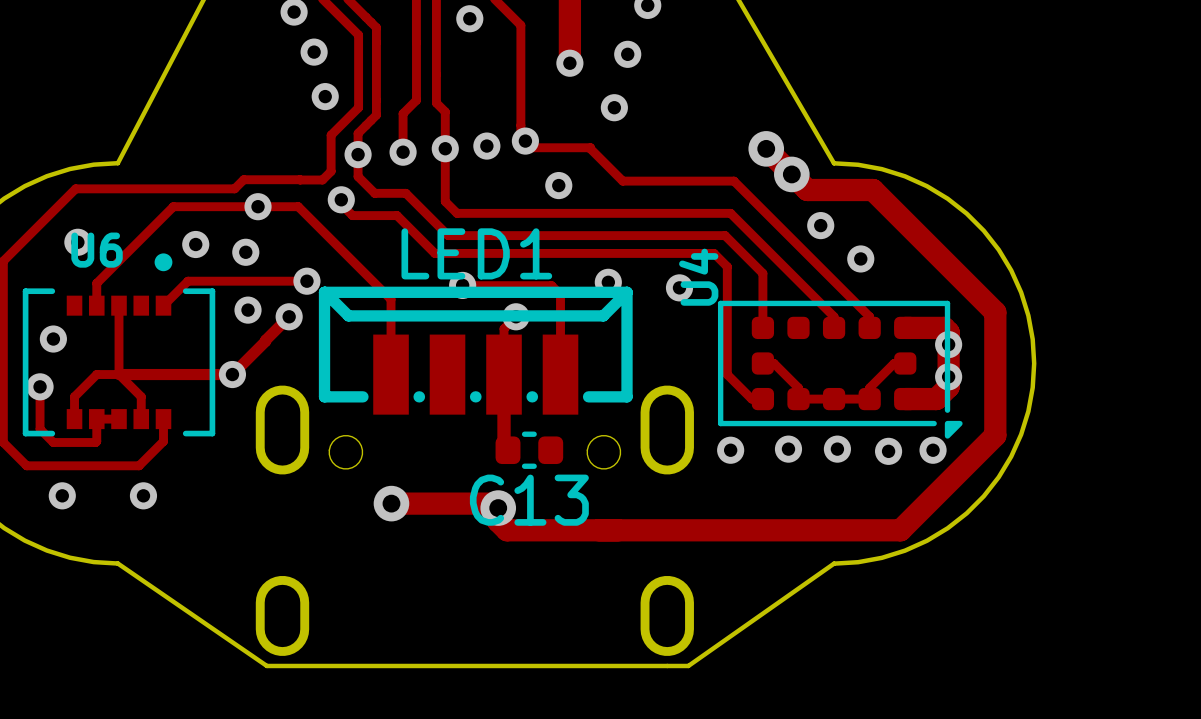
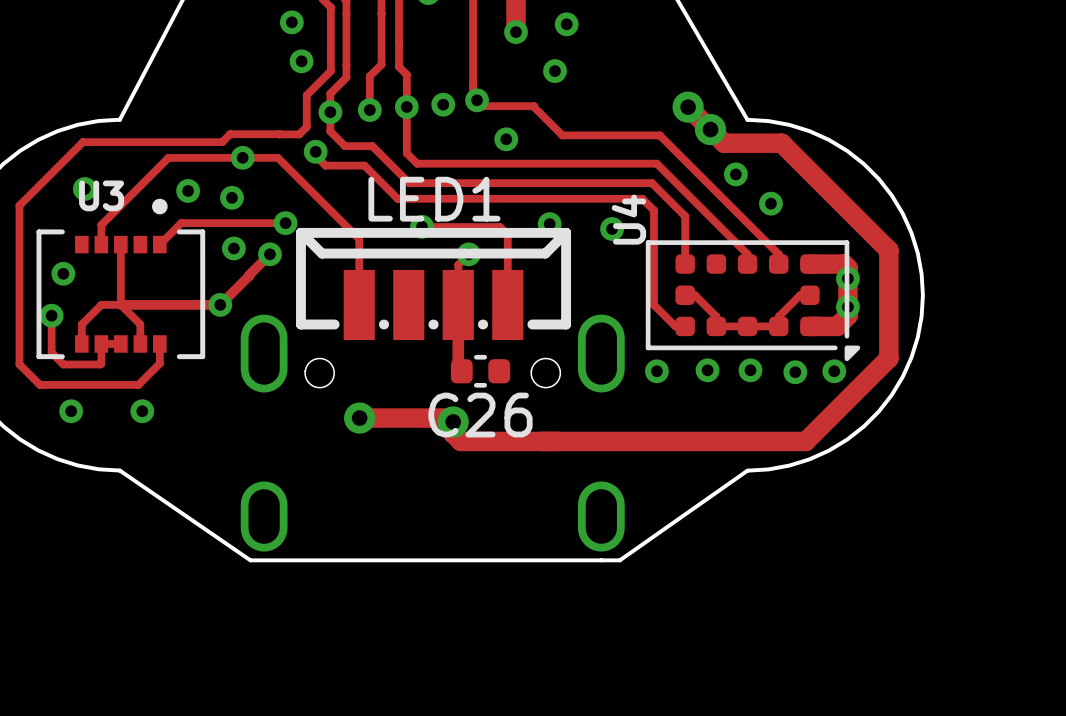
U6 name: U6 (97, 250) -> U3 (101, 195)
C13 name: C13 (529, 500) -> C26 (480, 415)

